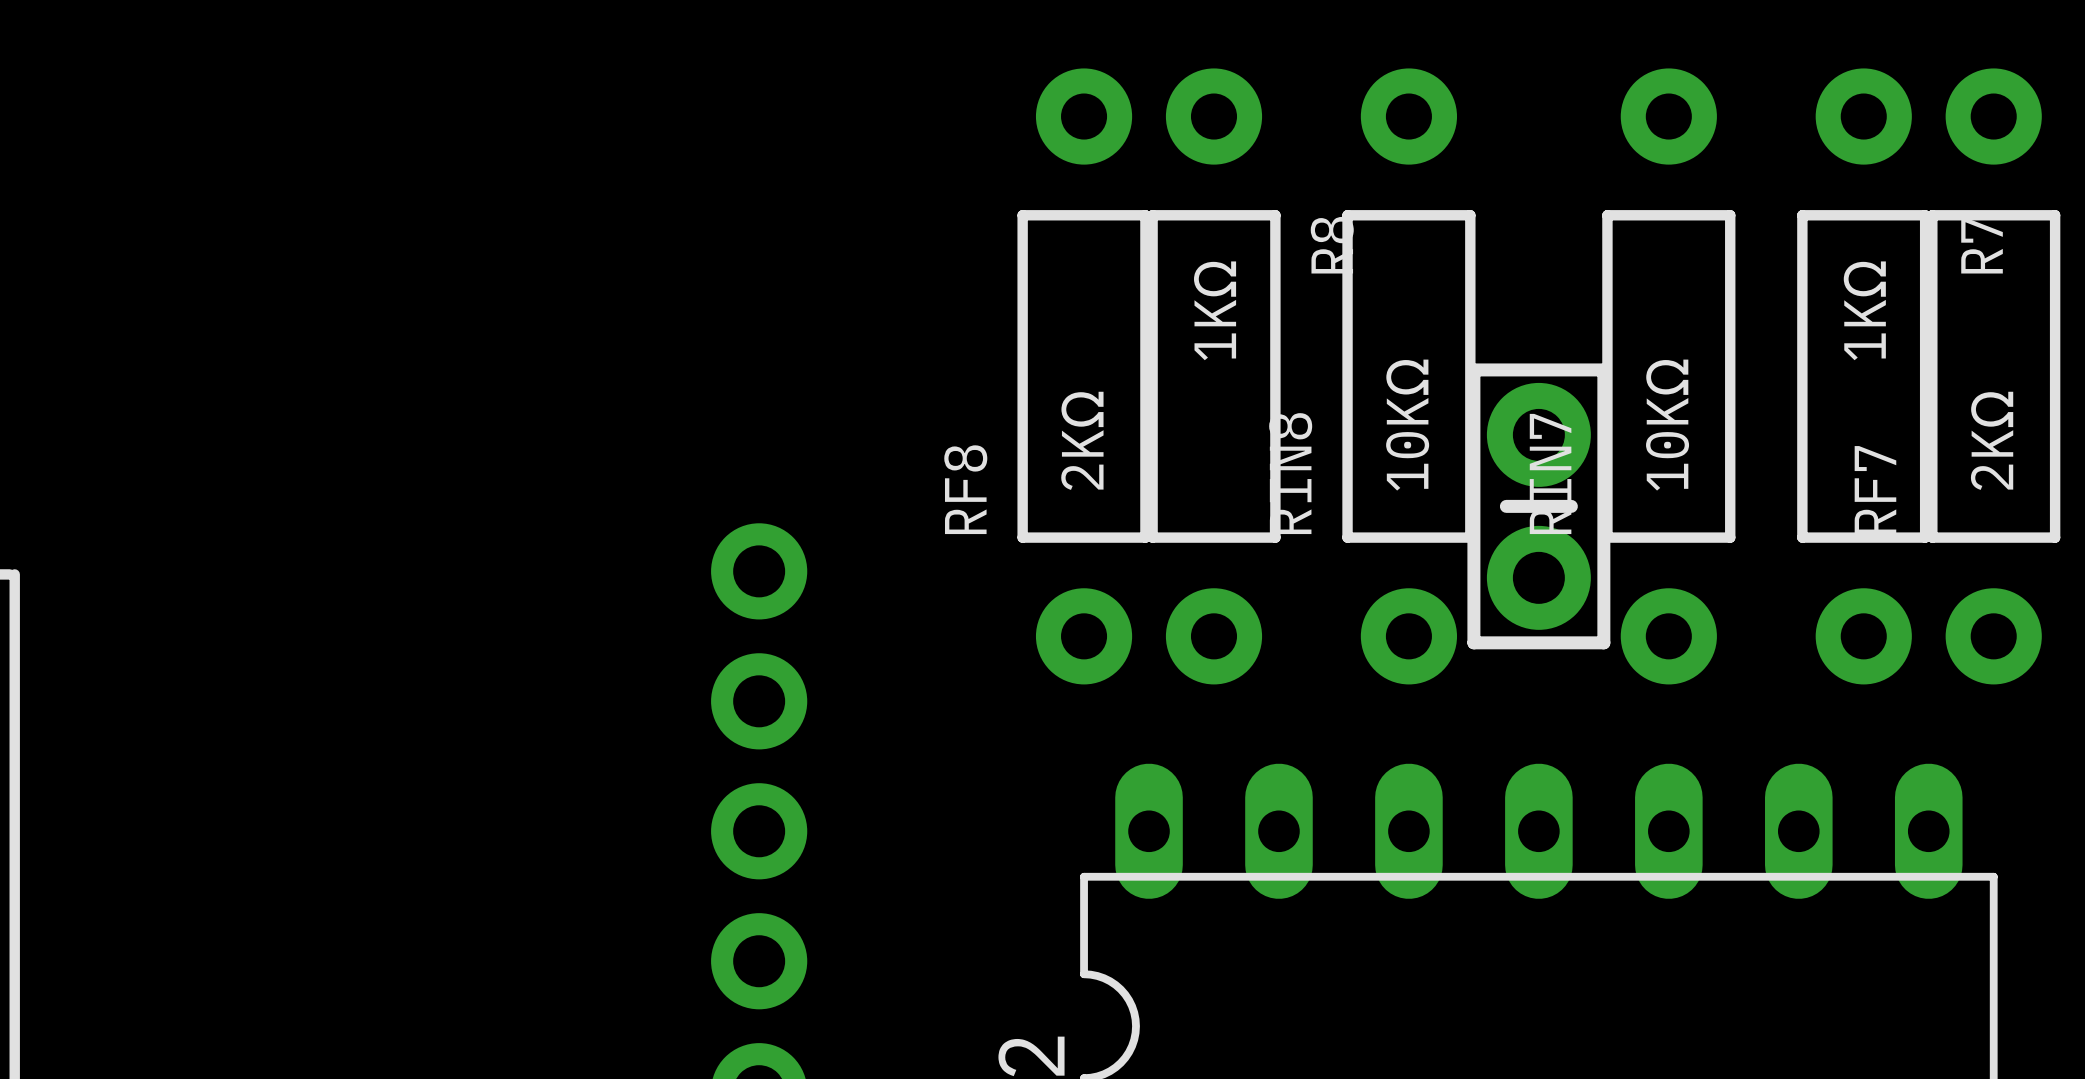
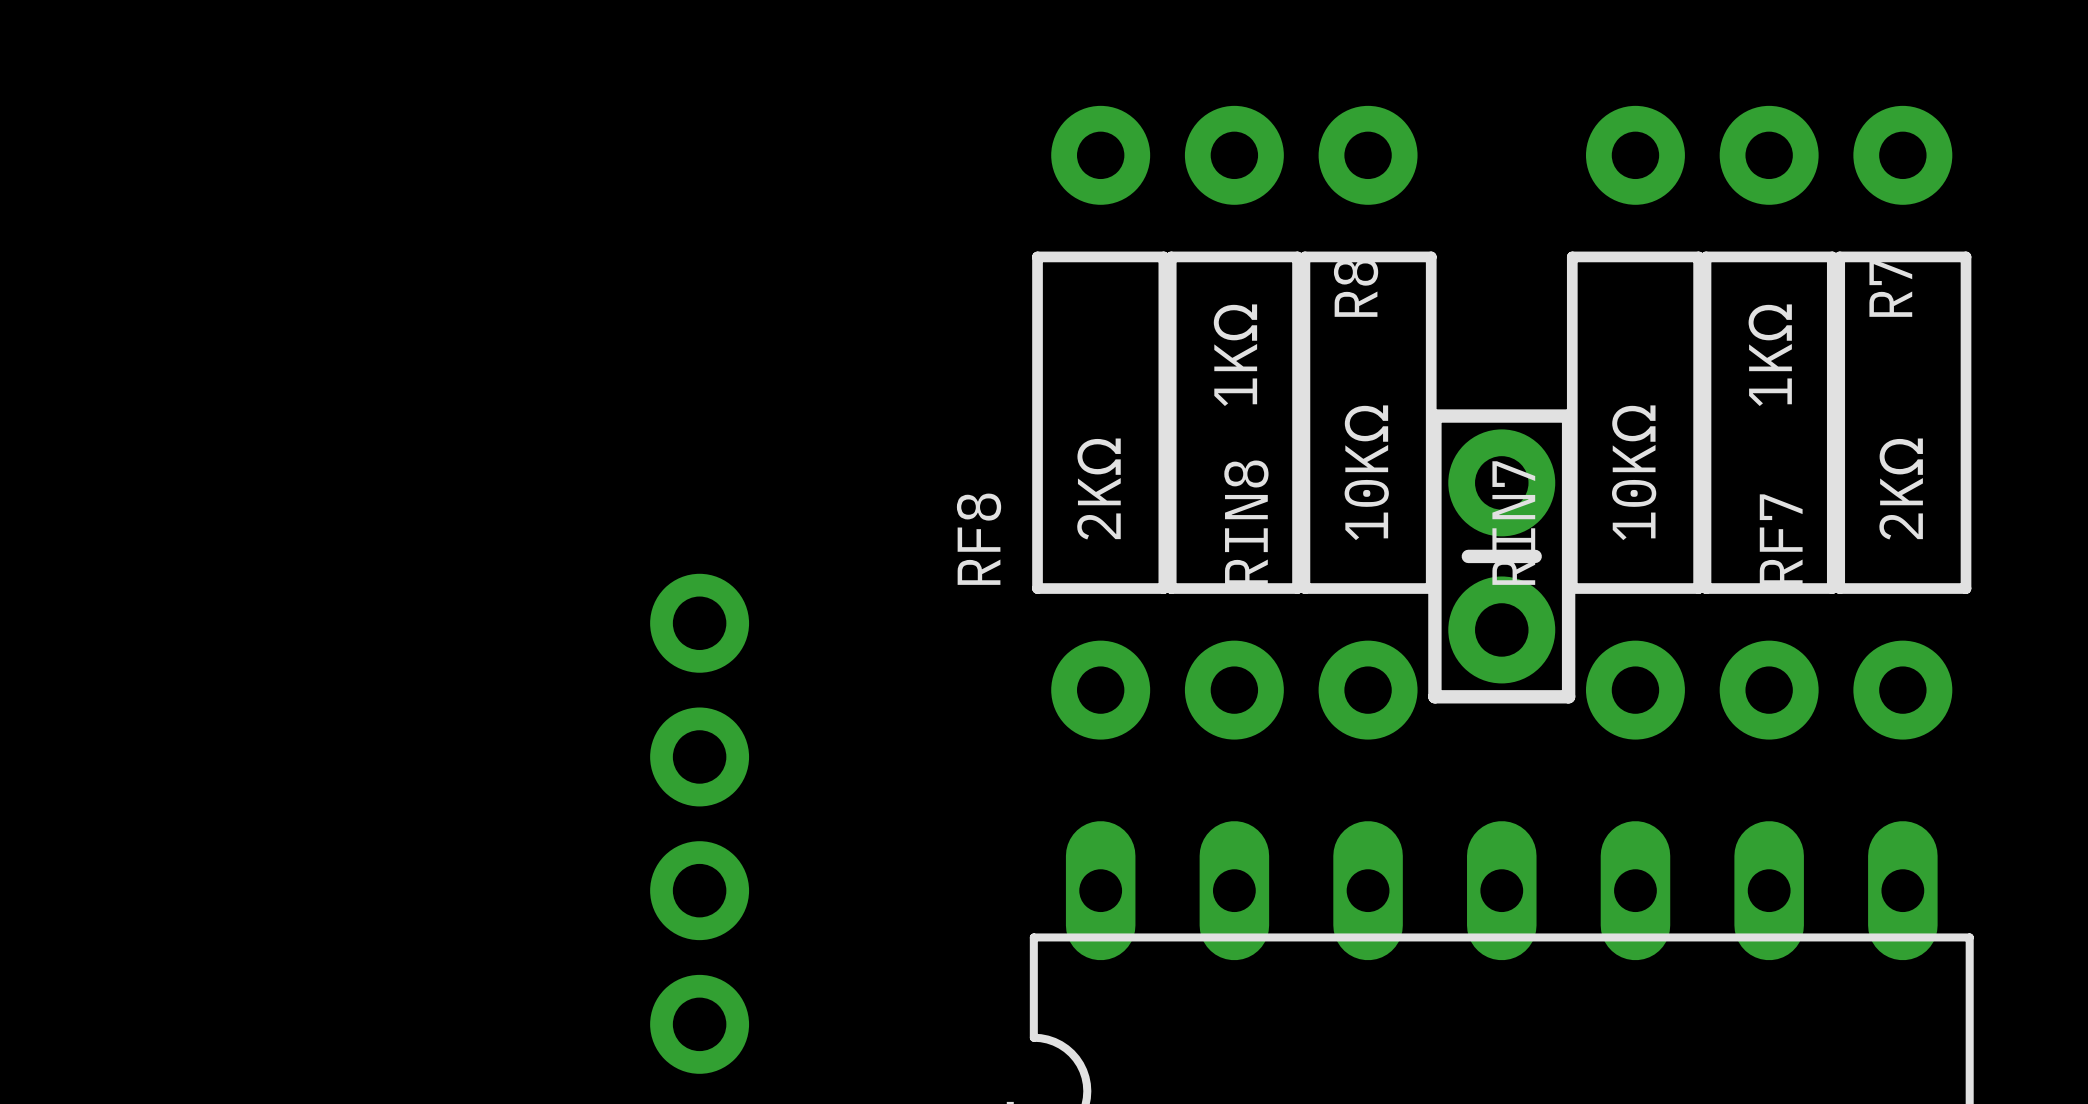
RF8 position: (1084, 376) -> (1100, 422)
R8 position: (1213, 376) -> (1234, 422)
R7 position: (1863, 376) -> (1769, 422)
RF7 position: (1993, 376) -> (1902, 422)

